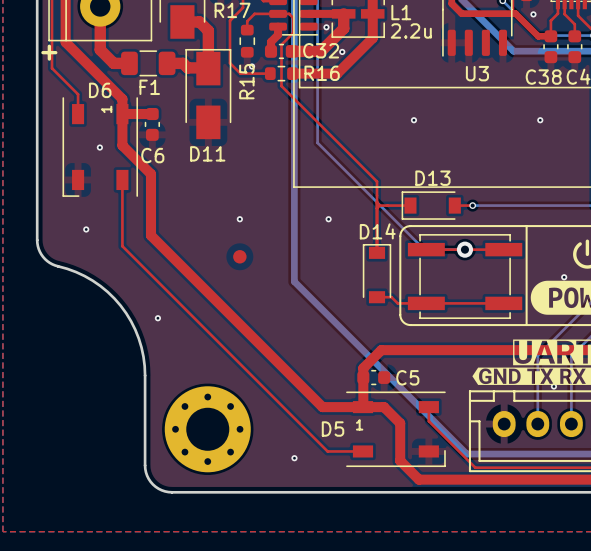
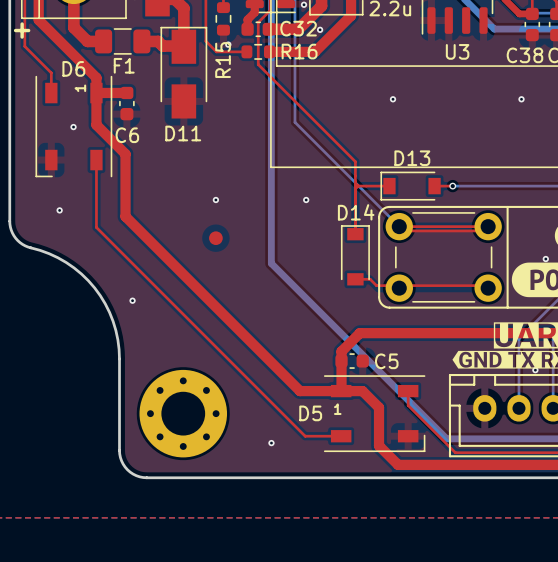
part footprint: [407, 234, 523, 319] -> [385, 212, 502, 303]
top track: none -> (399, 226) (488, 226)
via: (464, 249) -> none

